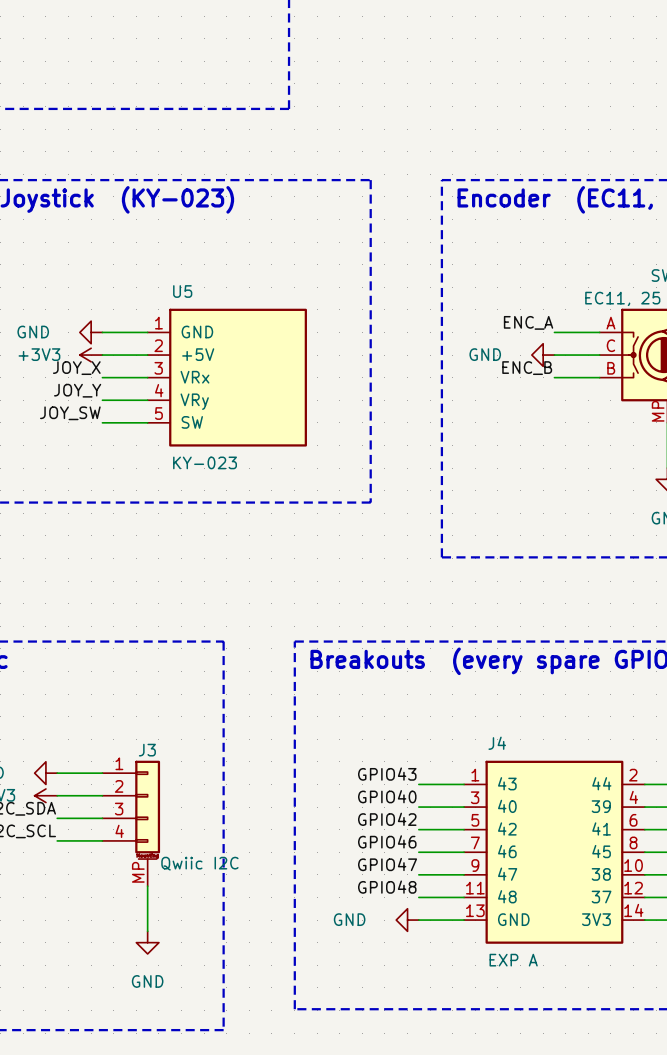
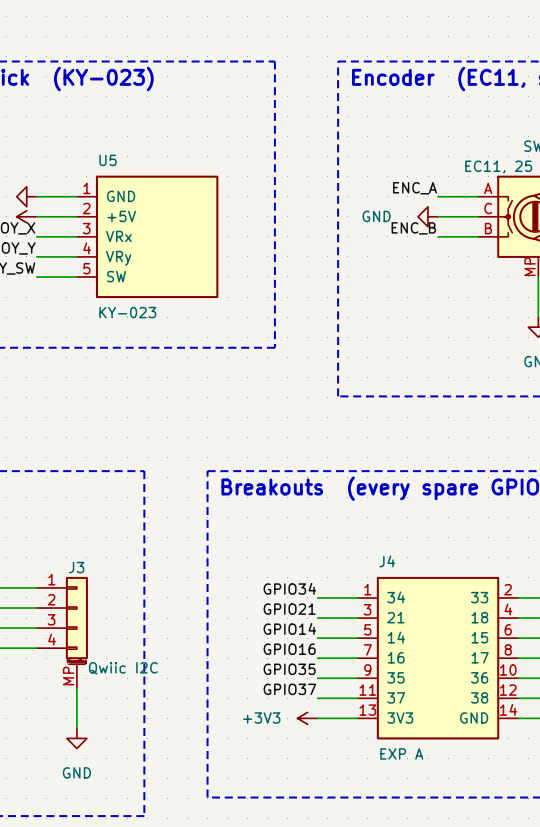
J4 symbol: [464, 760, 645, 944] -> [357, 576, 519, 740]
label: GPIO43 (387, 774) -> GPIO34 (289, 588)
label: GPIO40 (387, 796) -> GPIO21 (289, 609)
label: GPIO42 (387, 819) -> GPIO14 (289, 628)
label: GPIO46 (387, 841) -> GPIO16 (289, 649)
label: GPIO47 (387, 864) -> GPIO35 (289, 669)
label: GPIO48 (387, 887) -> GPIO37 (289, 689)
power symbol: GND (407, 920) -> +3V3 (307, 718)

